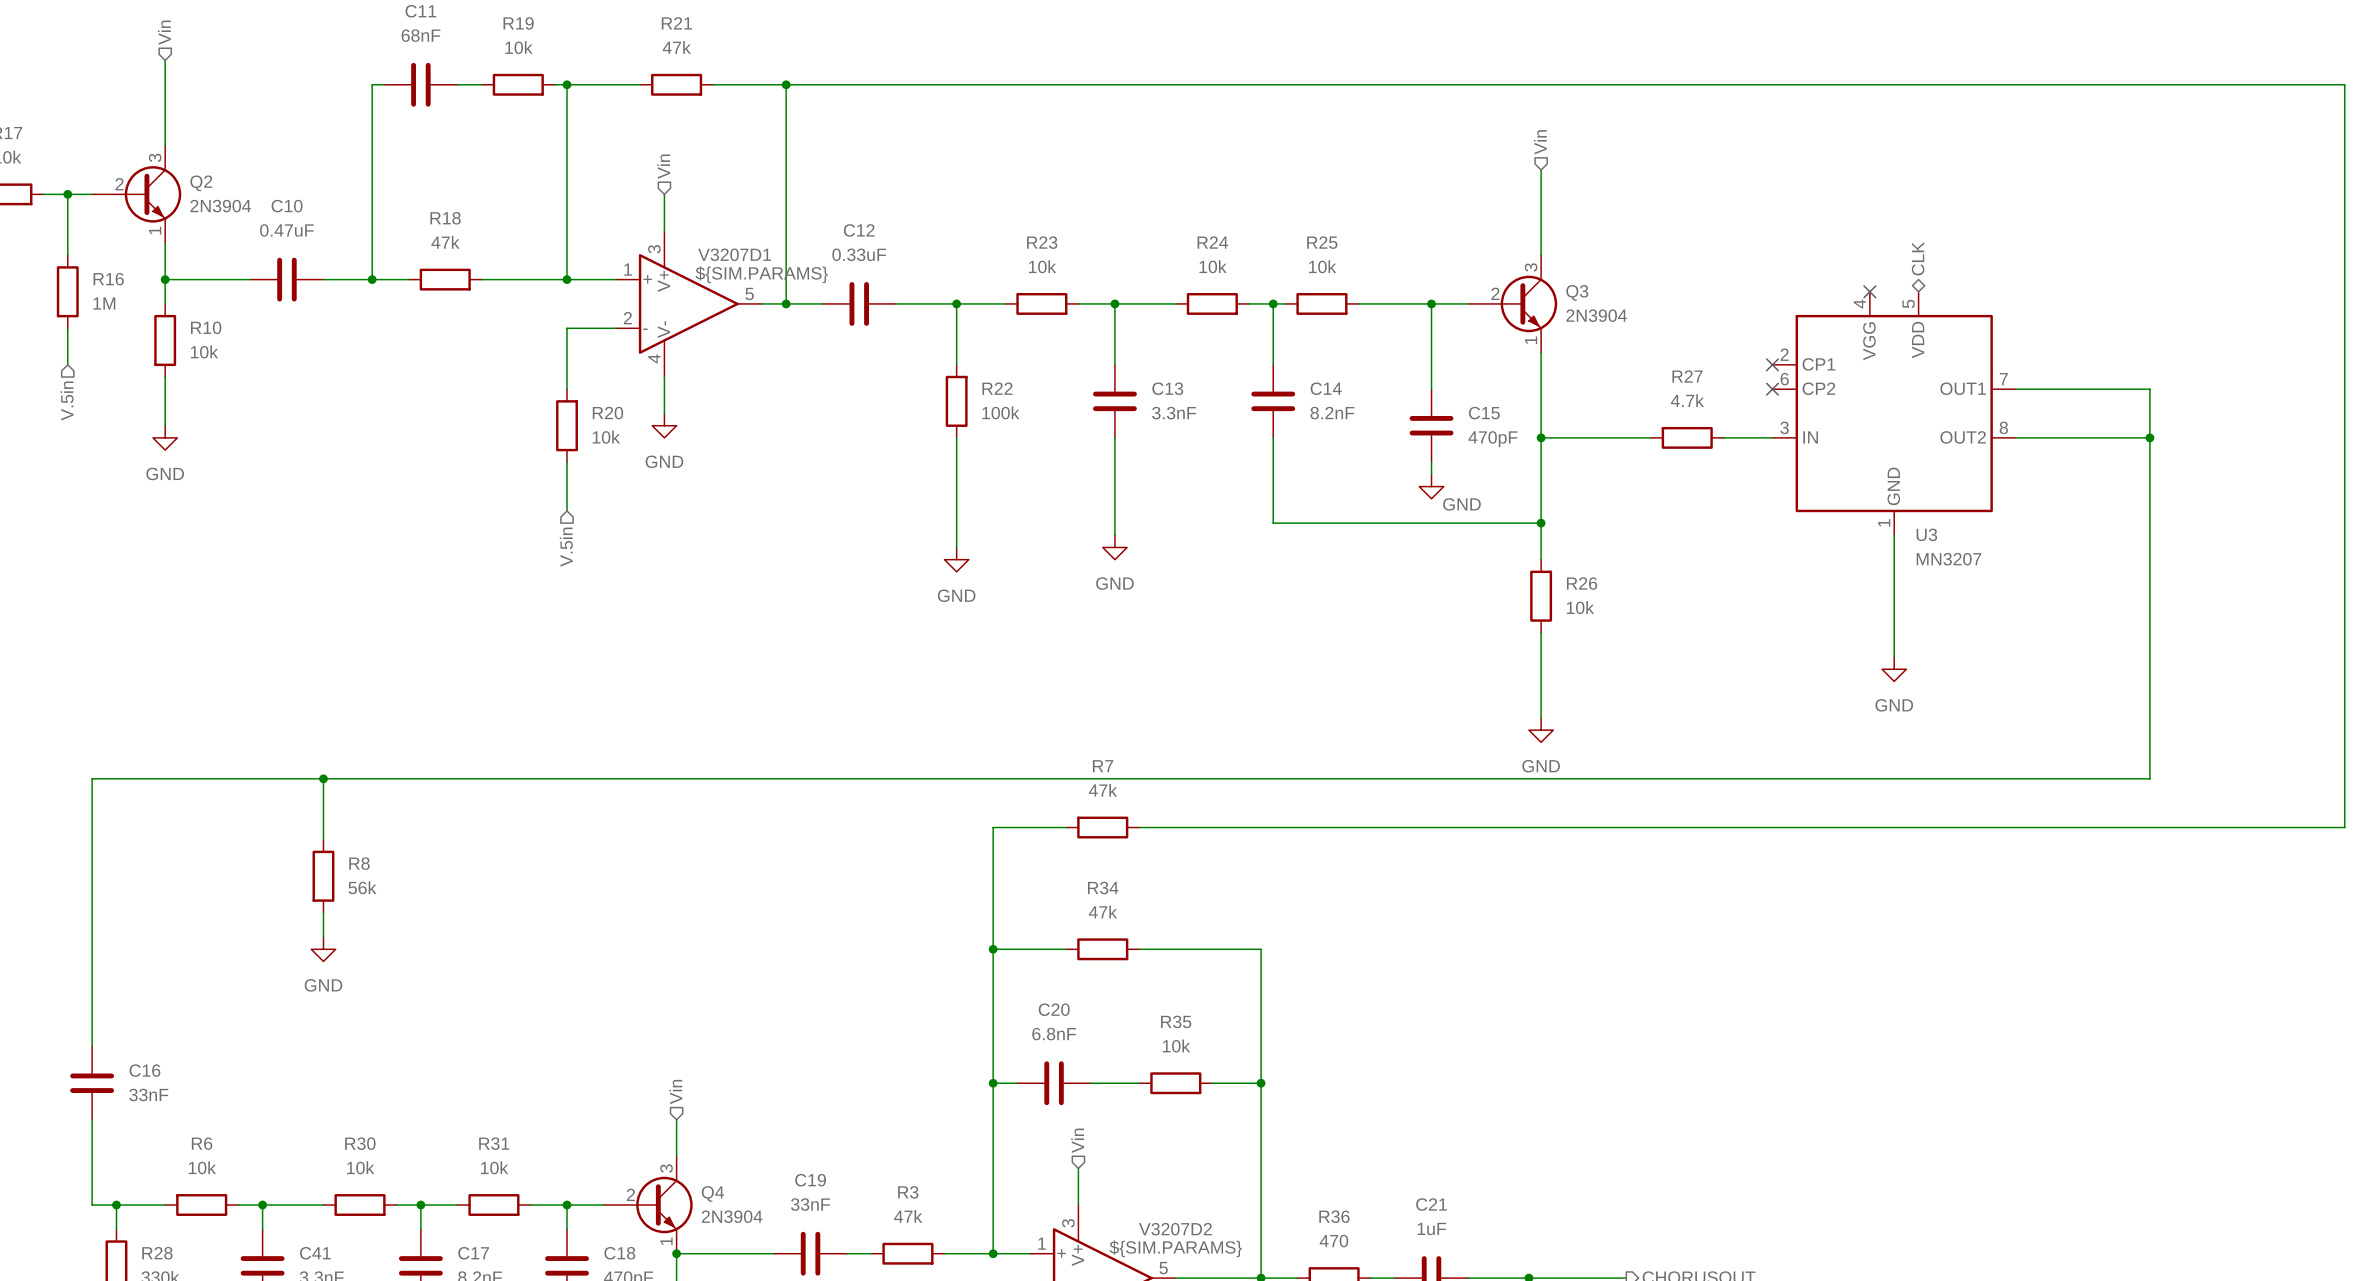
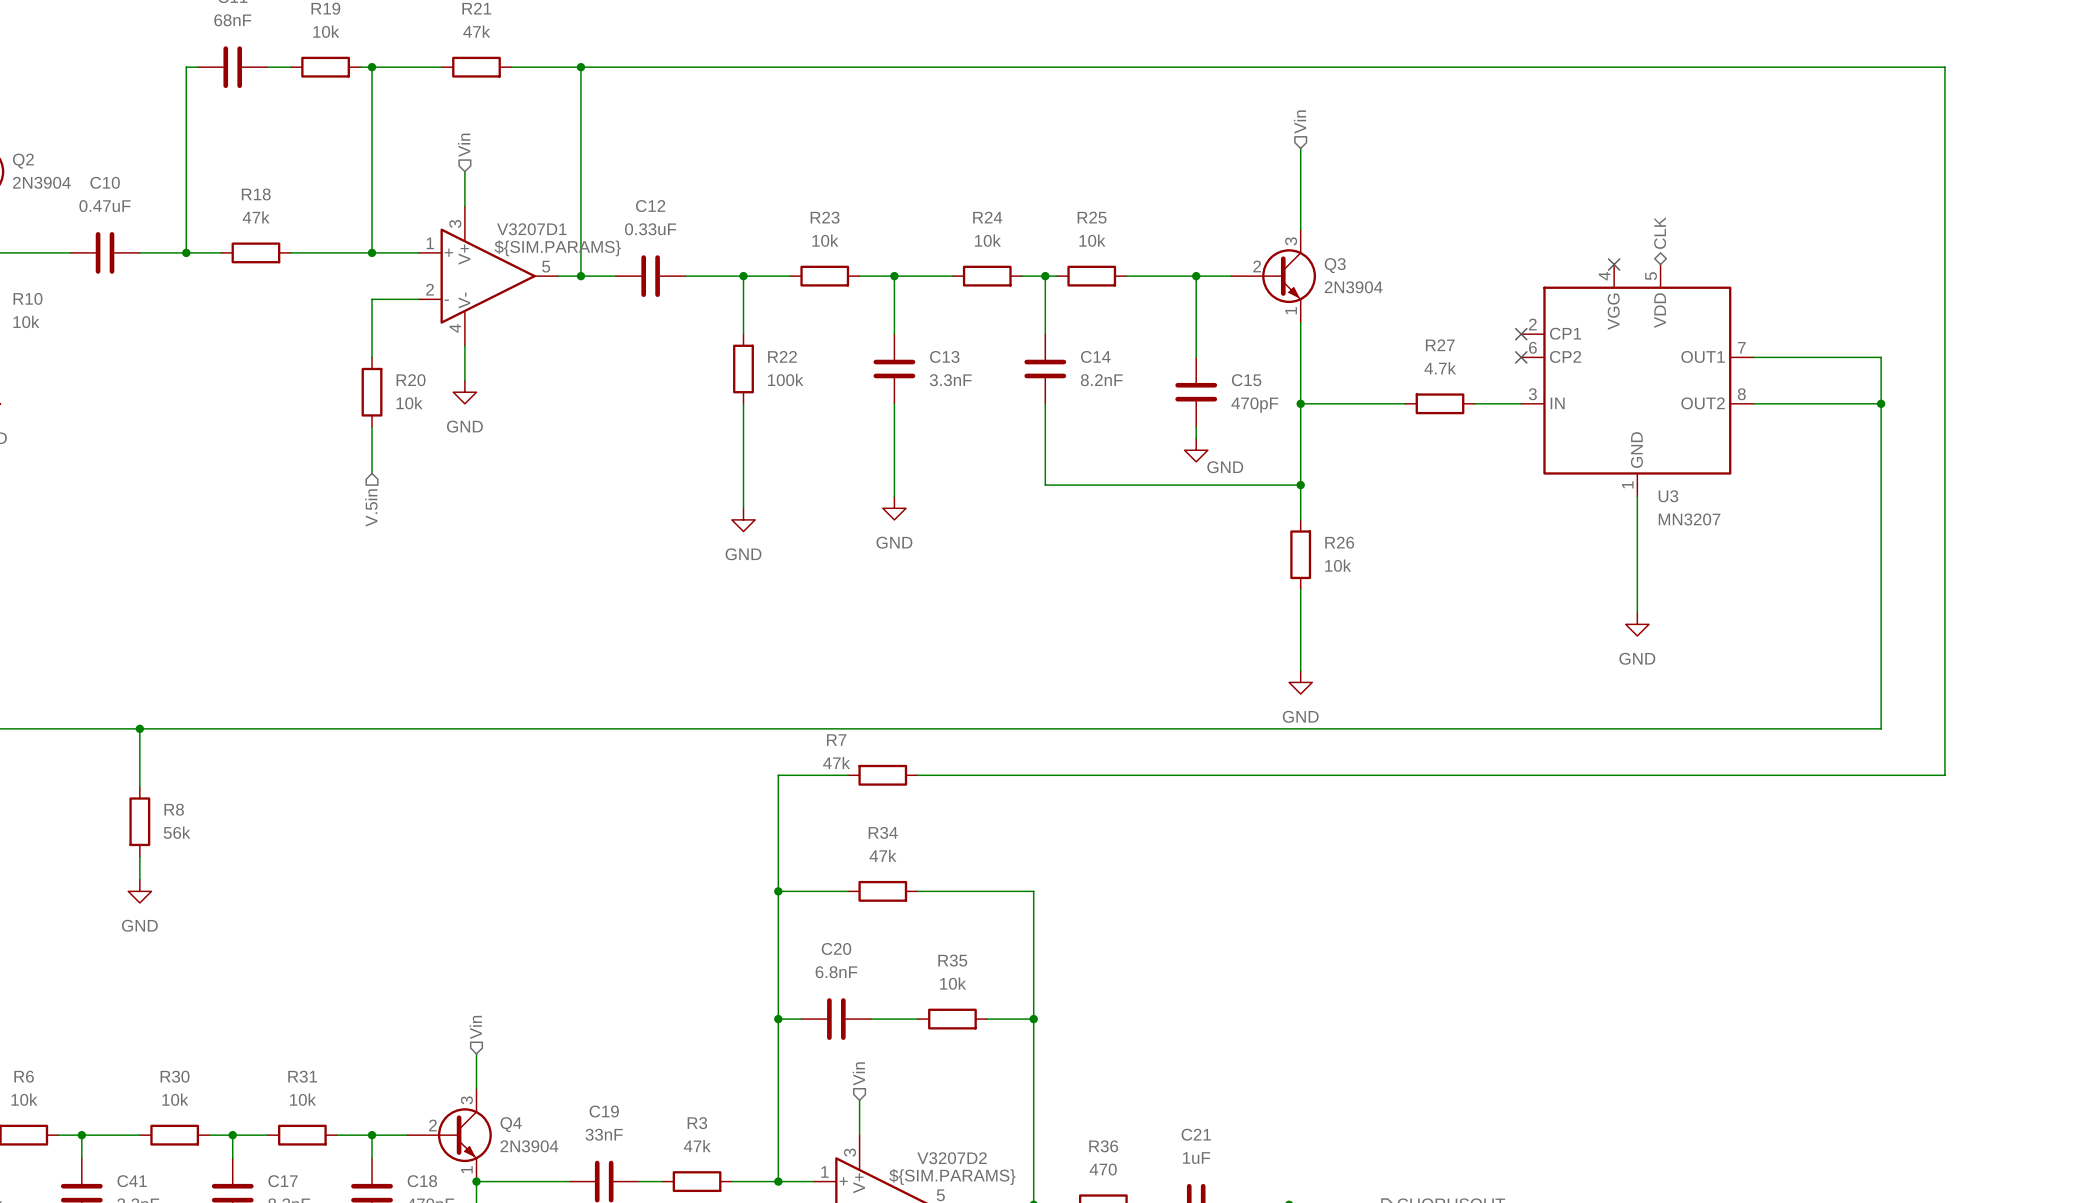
wire: (2216, 84) (2344, 84) (2344, 827) (2216, 827) -> (1944, 67) (1944, 775)
R7 name position: R7 (1103, 766) -> R7 (836, 740)
R7 value position: 47k (1102, 790) -> 47k (836, 762)

